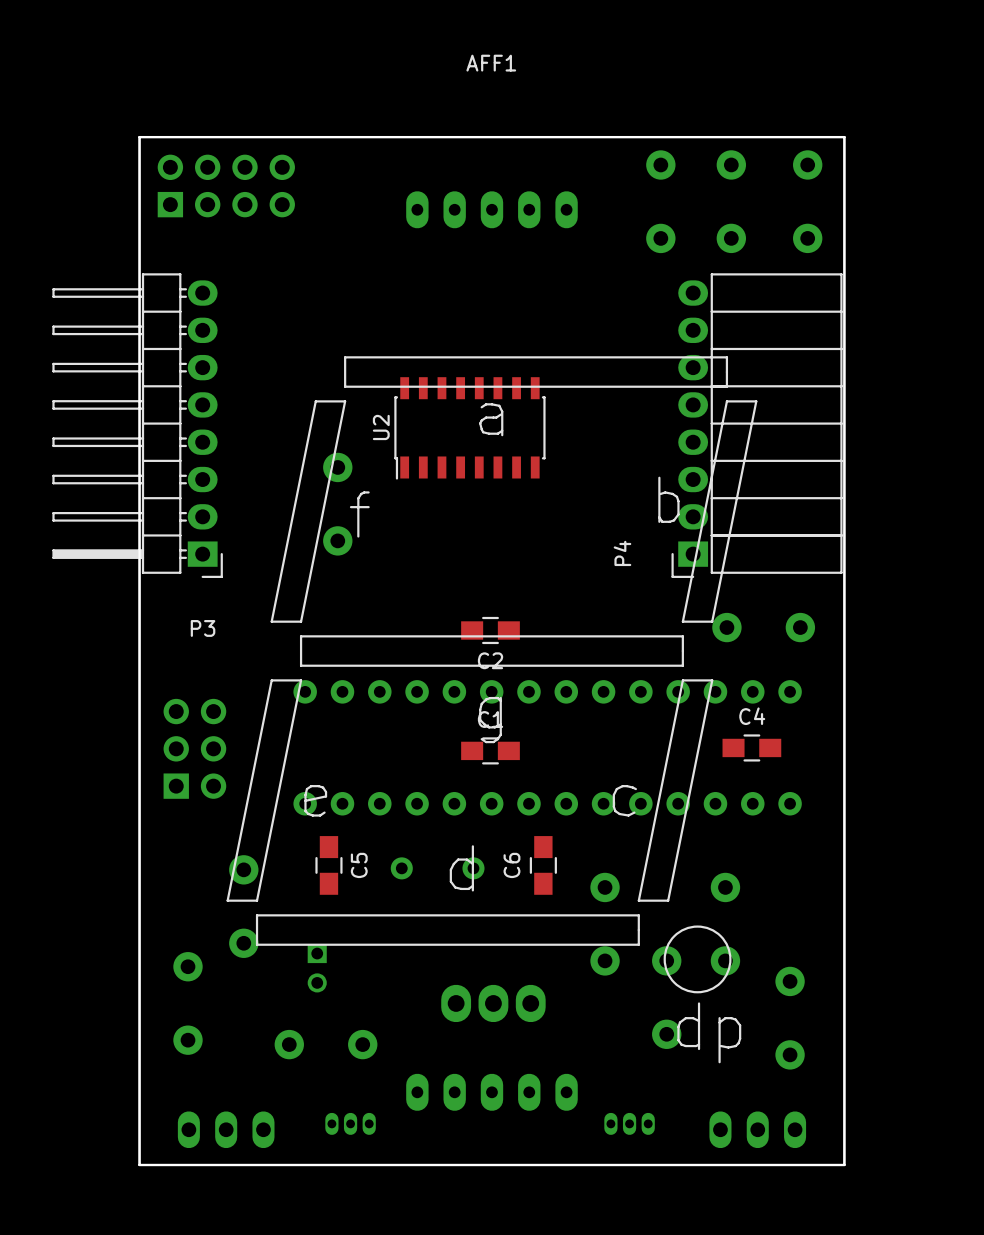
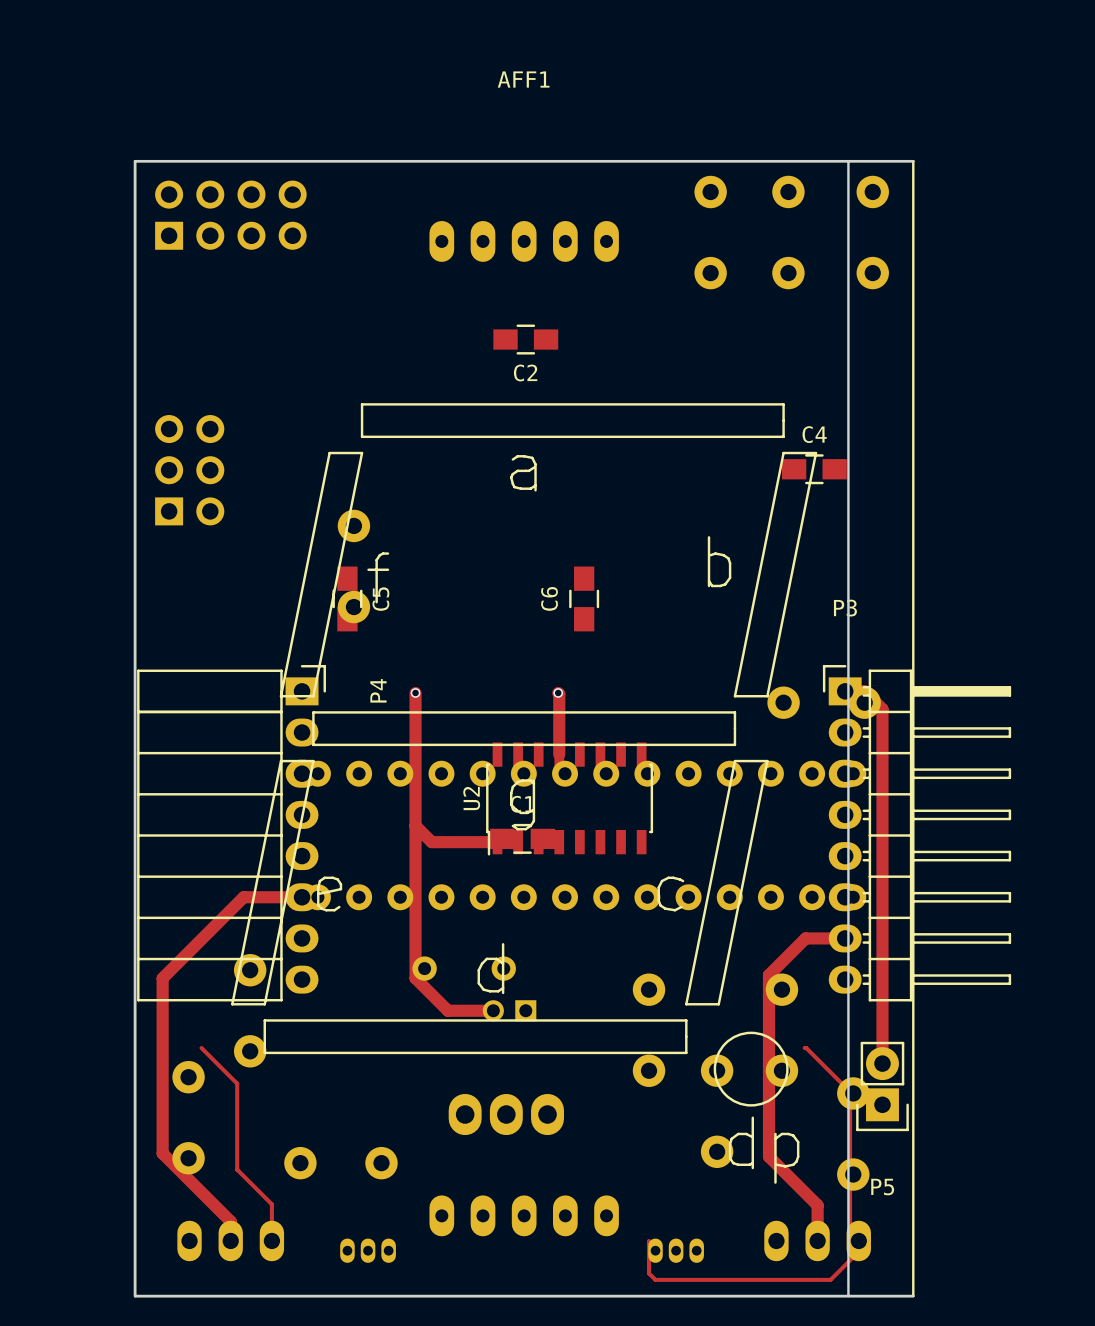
board edge: (844, 137) (844, 1165) -> (848, 161) (848, 1296)
P3 rotation: 0° (137, 425) -> 180° (917, 833)
P3 position: (137, 425) -> (917, 833)
P4 rotation: 0° (757, 425) -> 180° (231, 833)
P4 position: (757, 425) -> (231, 833)
U2 position: (469, 428) -> (569, 798)
track: none -> (845, 691) (864, 691) (882, 709) (882, 1063)
track: none -> (415, 692) (415, 978) (447, 1010) (493, 1010)
via: none -> (415, 692)
track: none -> (558, 692) (559, 754)
via: none -> (558, 692)
C2 position: (490, 630) -> (525, 339)
track: none -> (415, 825) (431, 842) (497, 842)
C4 position: (751, 747) -> (814, 469)
part position: (194, 748) -> (189, 470)
track: none -> (302, 897) (243, 897) (162, 978) (162, 1153) (230, 1221) (230, 1240)
track: none -> (845, 938) (805, 938) (768, 975) (768, 1156) (817, 1205) (817, 1240)
C5 position: (328, 865) -> (347, 598)
C6 position: (543, 865) -> (584, 598)
track: none -> (201, 1048) (237, 1083) (237, 1169) (271, 1204) (271, 1240)
track: none -> (804, 1048) (850, 1091) (850, 1232) (858, 1240) (858, 1251) (830, 1279) (655, 1279) (649, 1273) (649, 1240)
part rotation: 0° (317, 968) -> 90° clockwise (509, 1010)
part position: (317, 968) -> (509, 1010)
P5: none -> (882, 1086)
part position: (493, 1003) -> (506, 1114)
part position: (226, 1129) -> (230, 1240)
part position: (757, 1129) -> (817, 1240)

